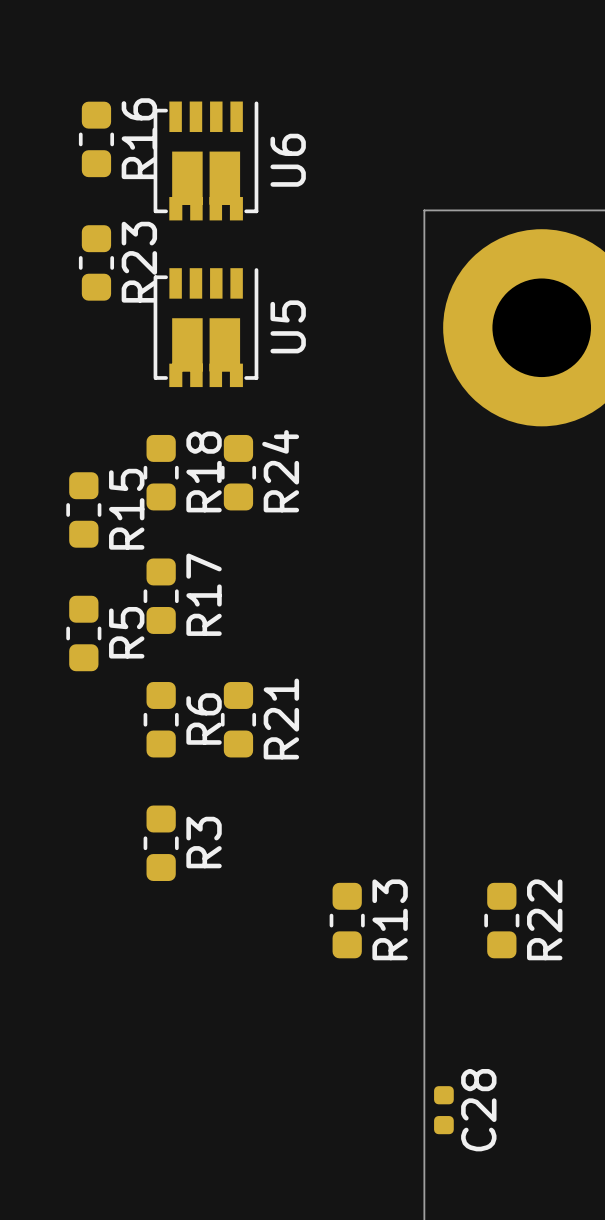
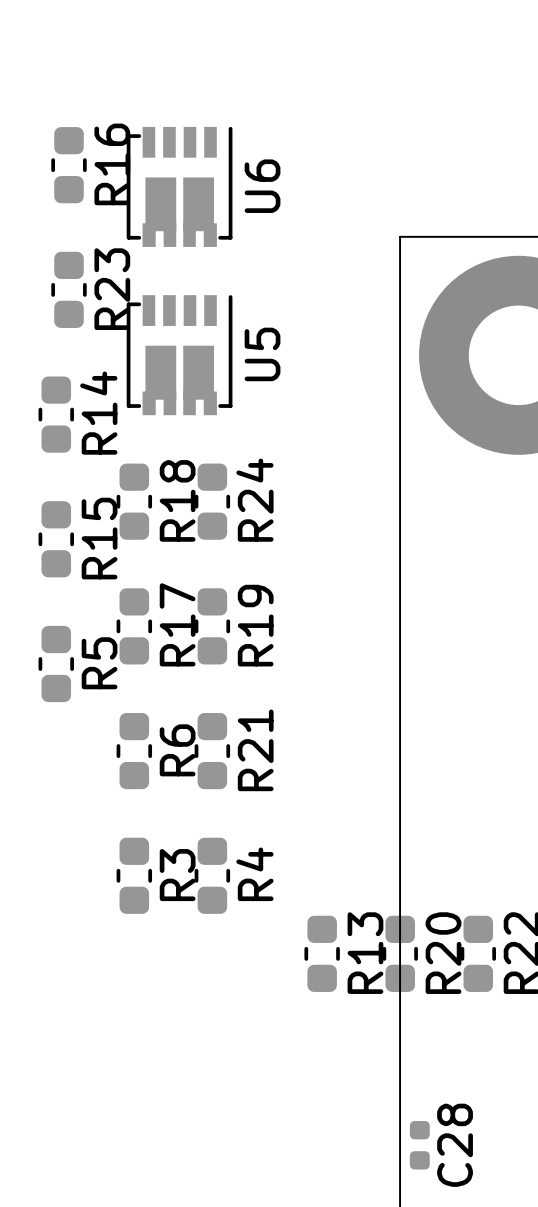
R14: none -> (56, 414)
R19: none -> (212, 626)
R4: none -> (212, 875)
R20: none -> (400, 953)

